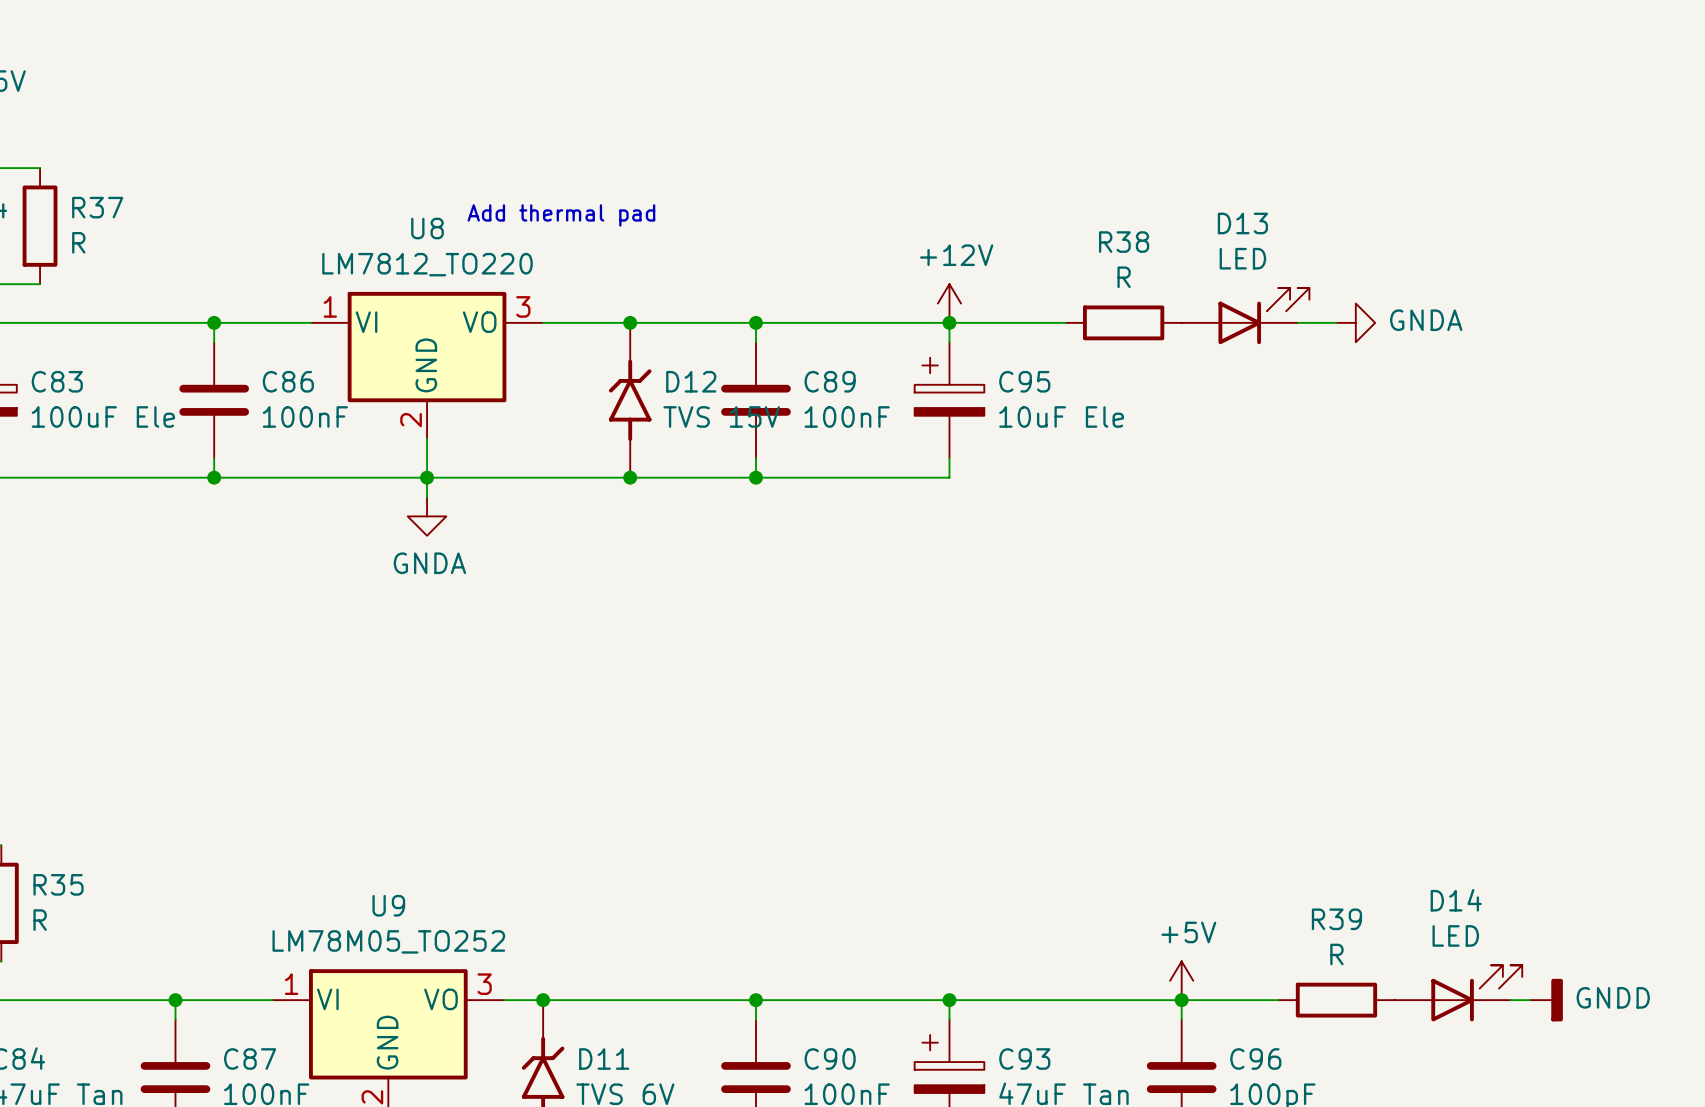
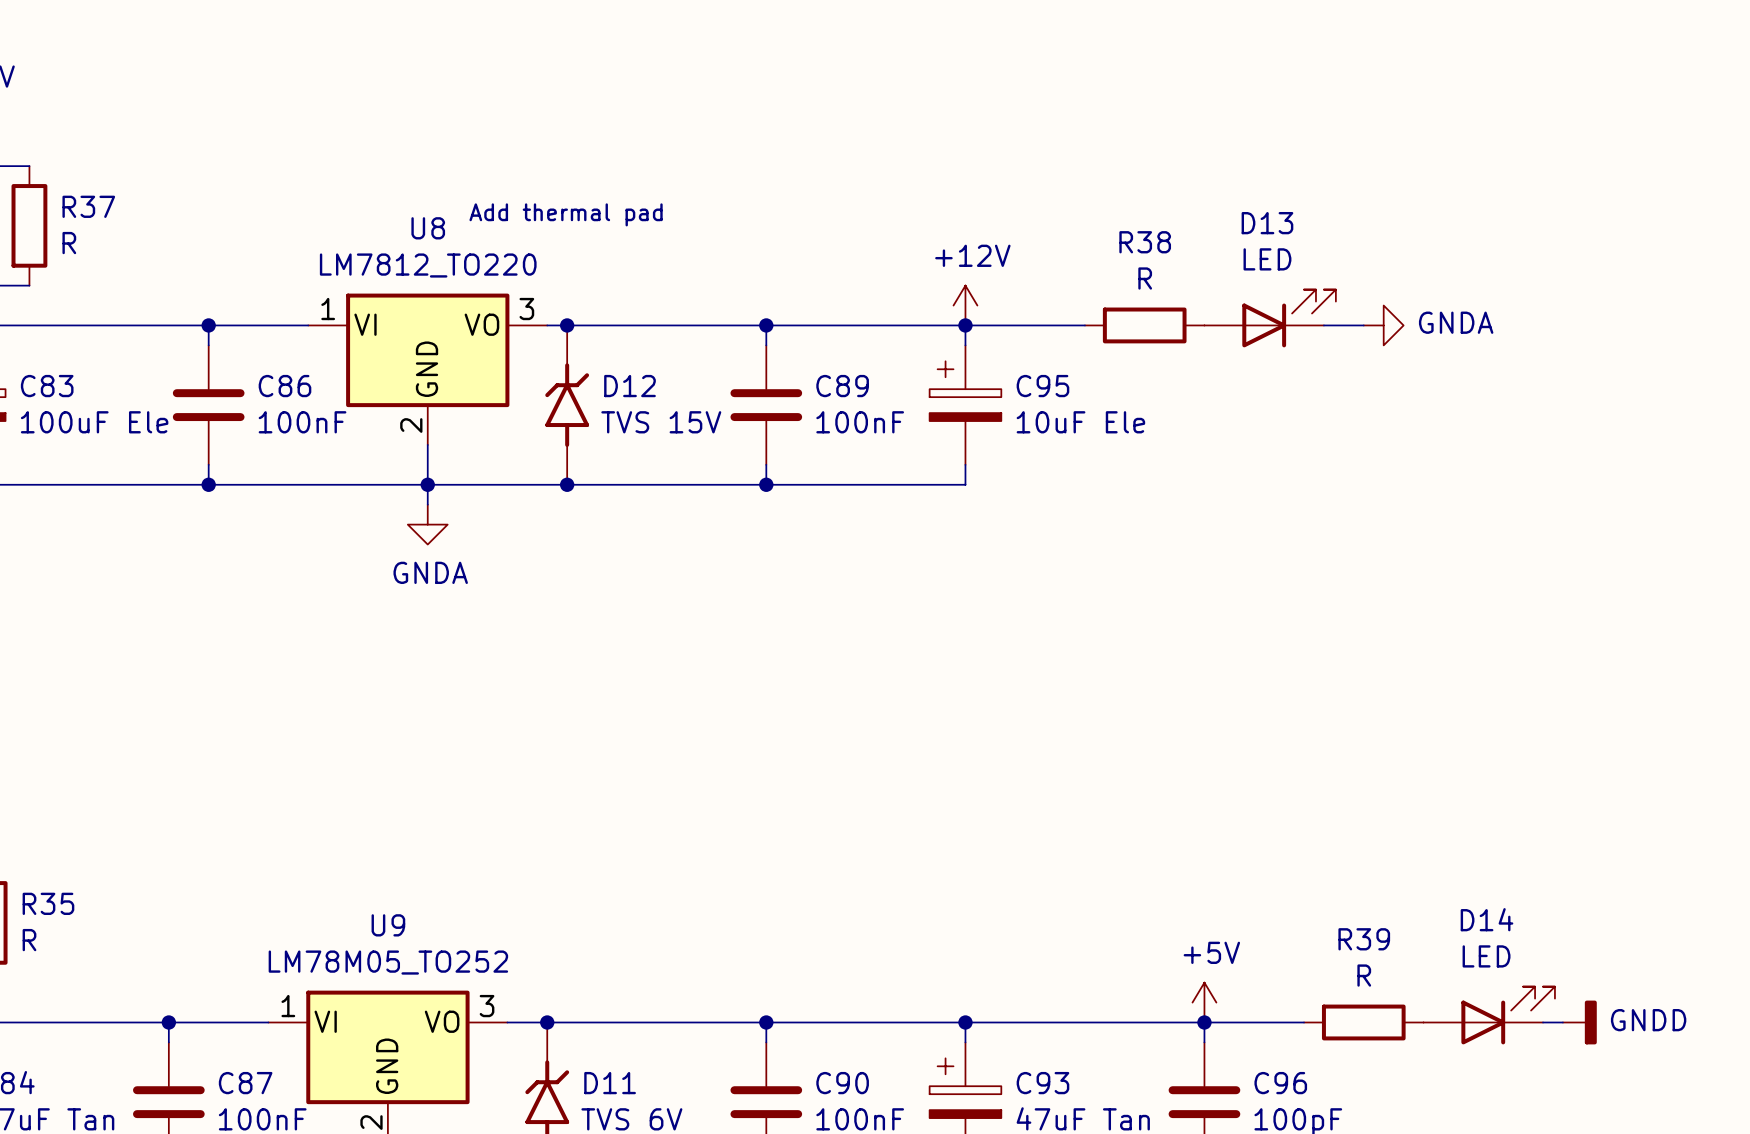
junction position: (630, 322) -> (567, 325)
D12 position: (630, 400) -> (567, 405)
junction position: (630, 477) -> (567, 484)

